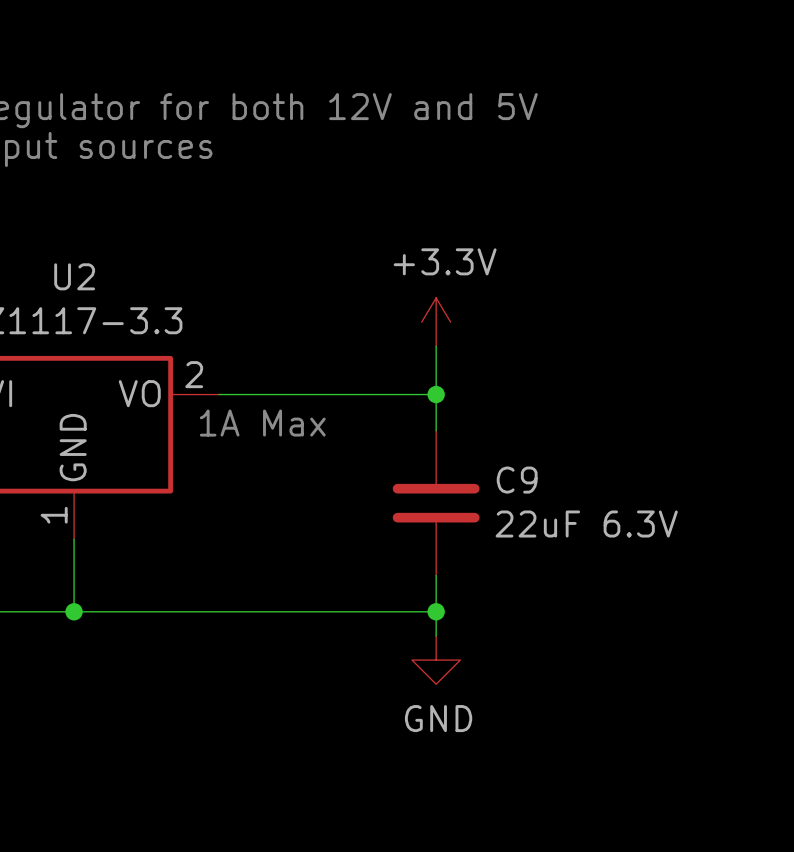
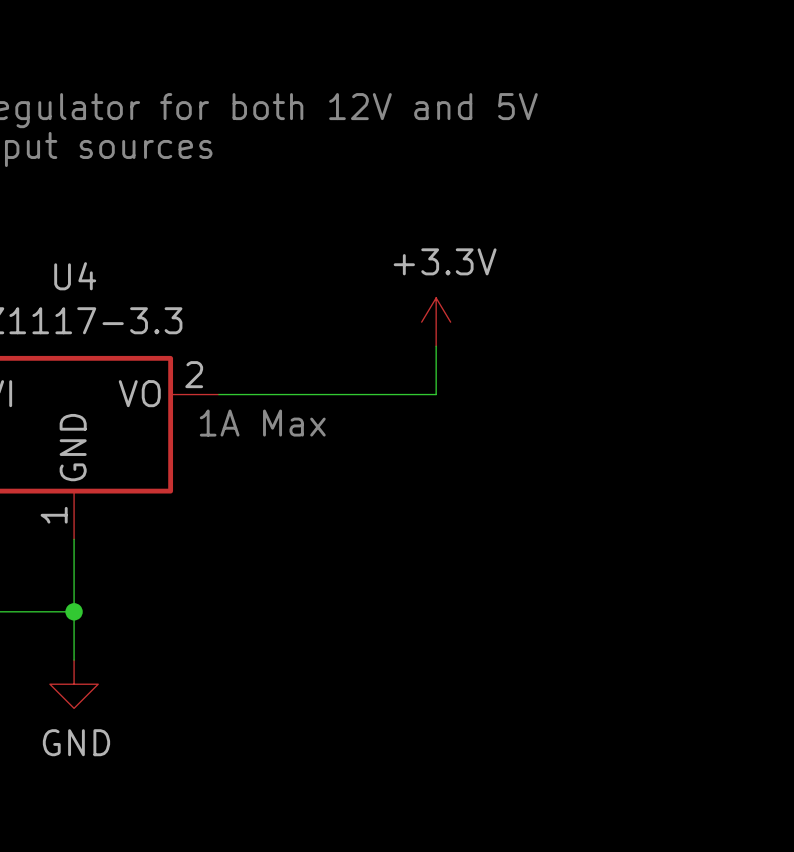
U2 name: U2 (74, 276) -> U4 (75, 276)
wire: (436, 394) (436, 430) -> none
junction: (436, 394) -> none
C9: 22uF 6.3V (436, 503) -> none
wire: (436, 575) (436, 635) -> none
wire: (74, 611) (436, 611) -> (74, 611) (74, 660)
junction: (436, 611) -> none
power symbol position: GND (436, 660) -> GND (74, 684)

